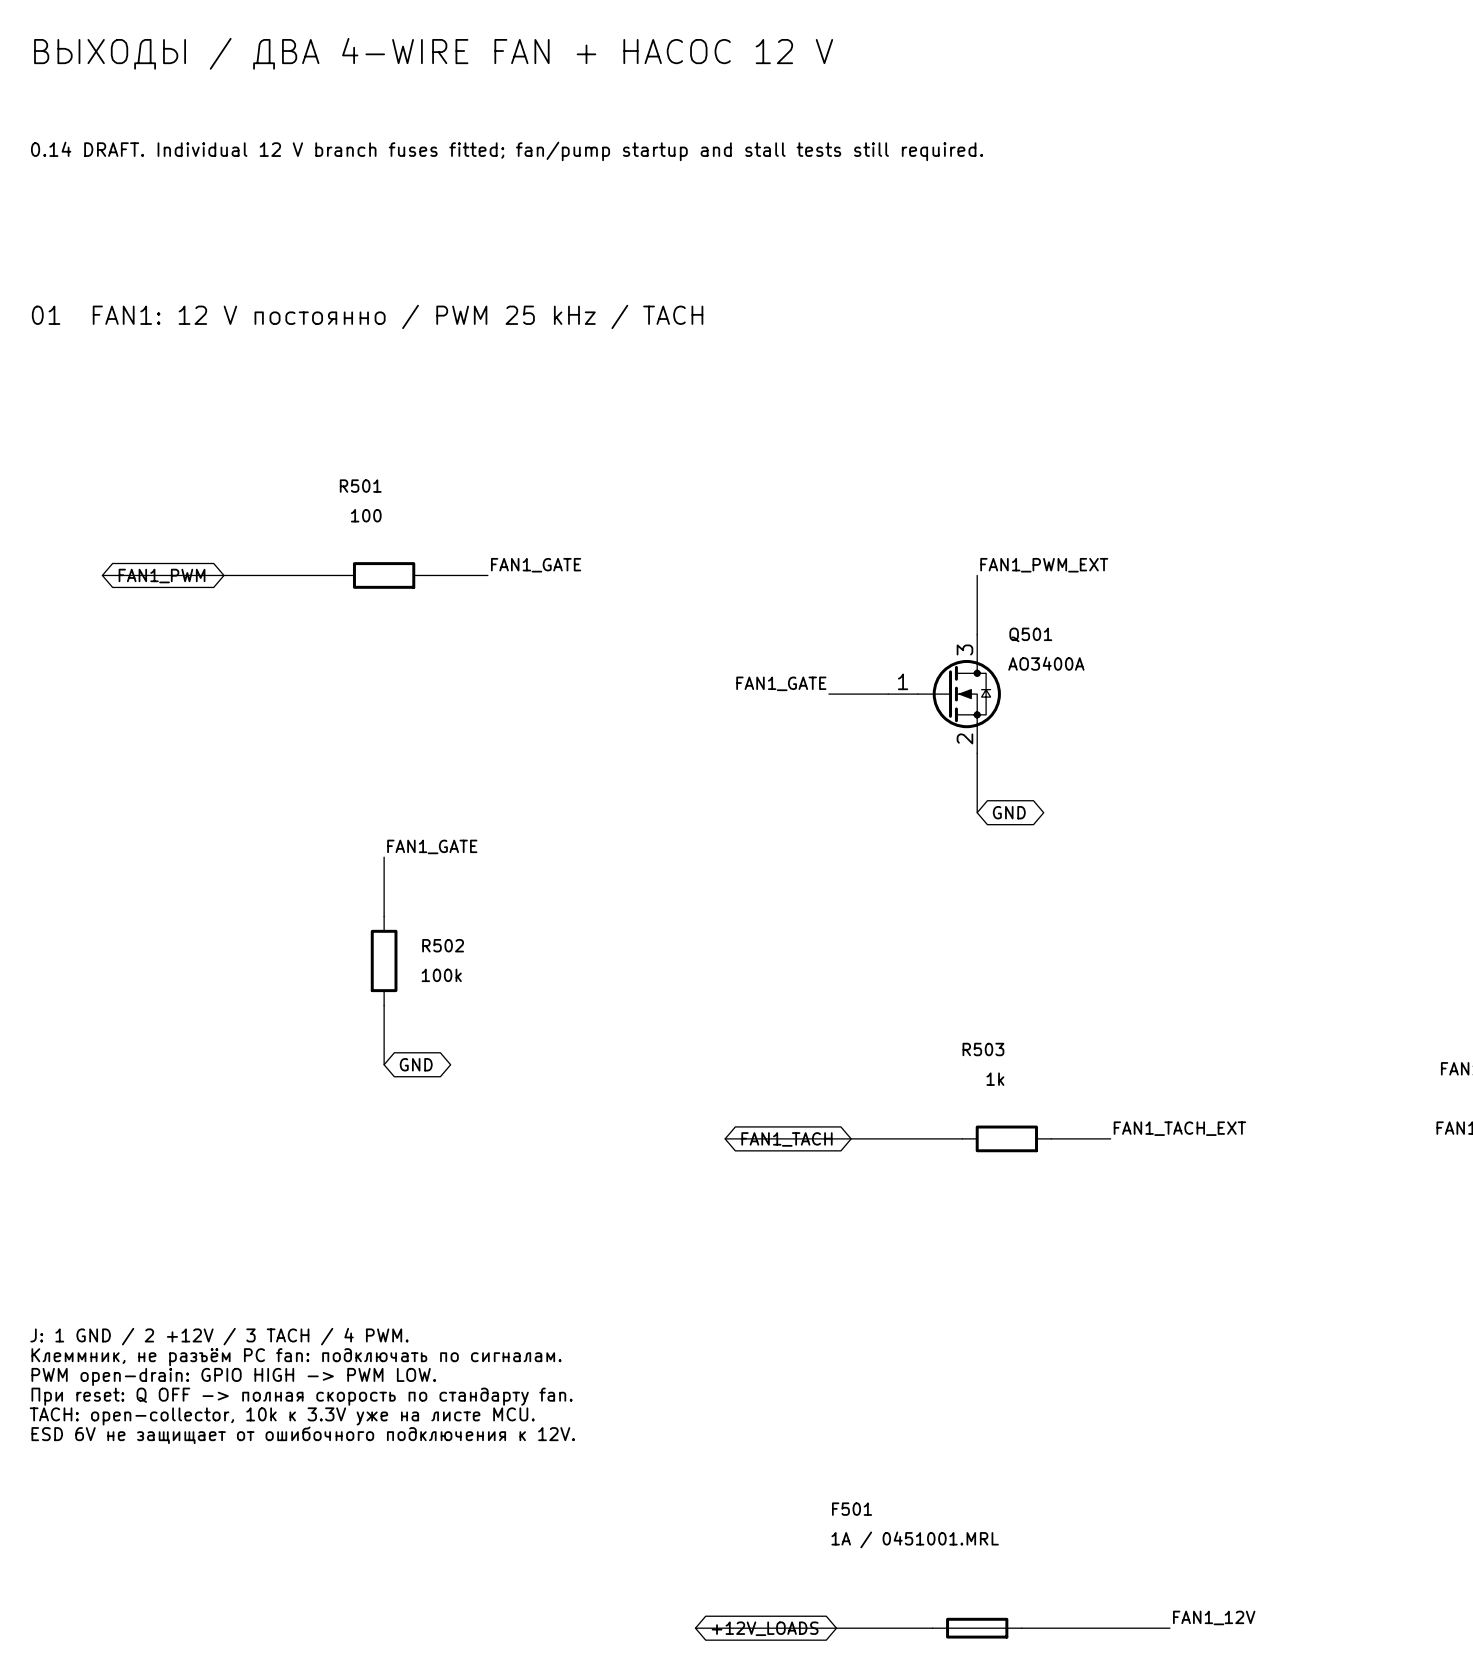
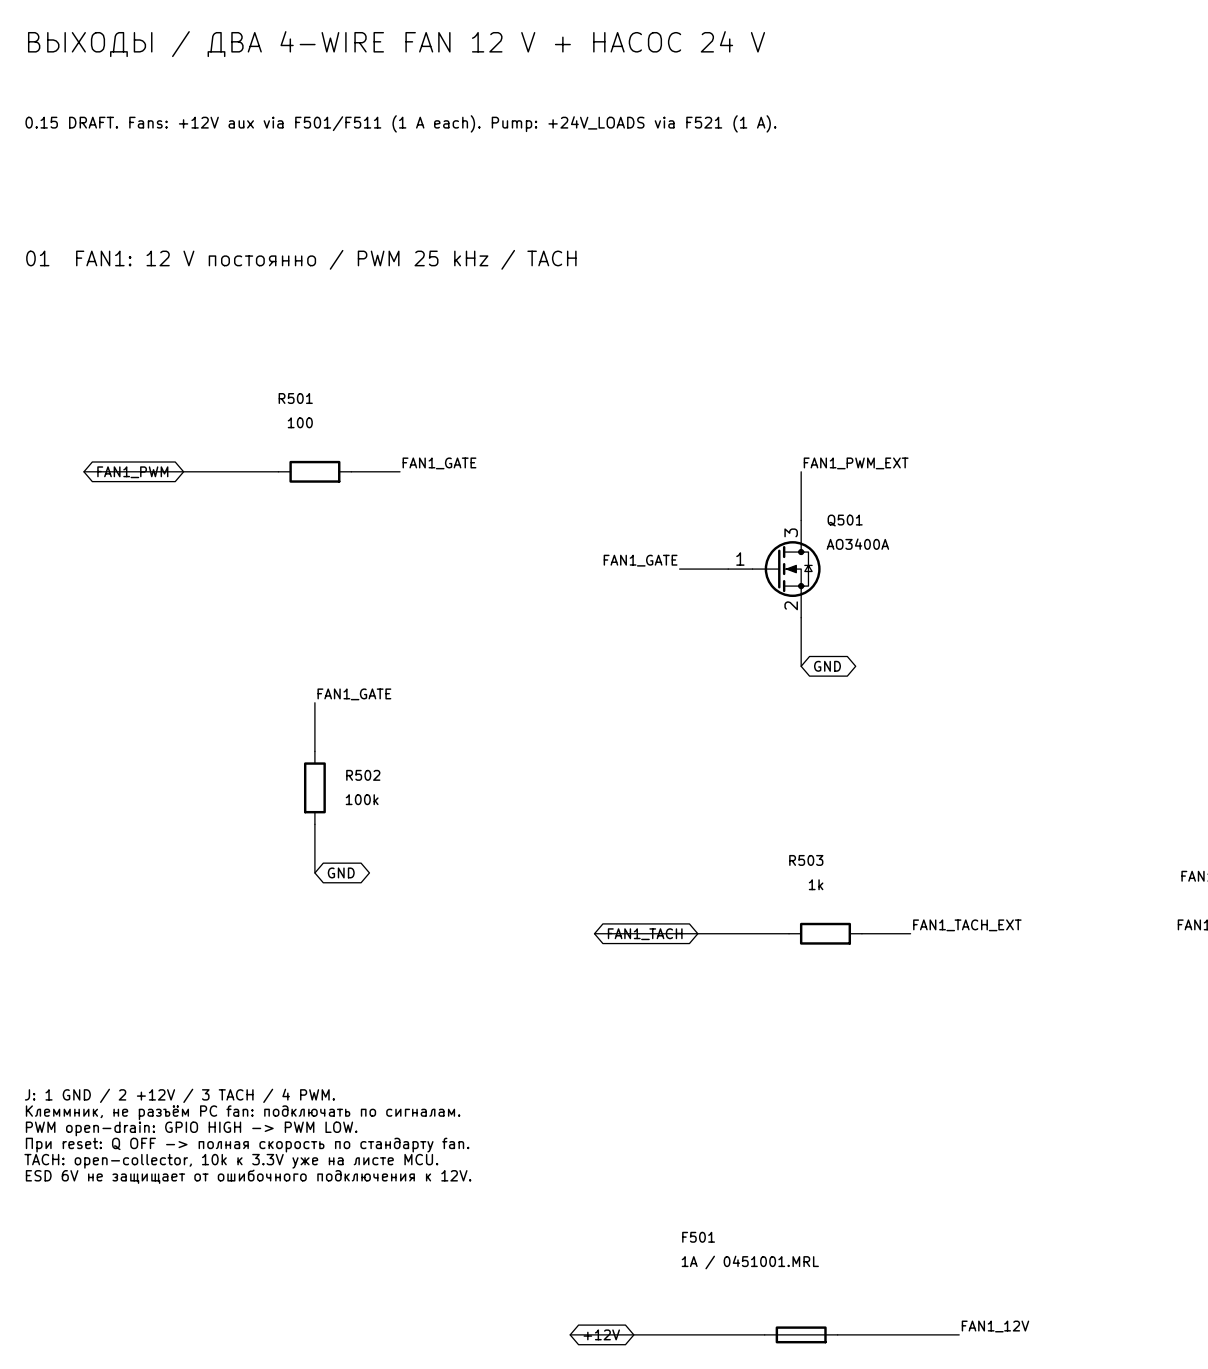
text: ВЫХОДЫ / ДВА 4-WIRE FAN + НАСОС 12 V (433, 53) -> ВЫХОДЫ / ДВА 4-WIRE FAN 12 V + НАСОС 24 V (396, 44)
text: 0.14 DRAFT. Individual 12 V branch fuses fitted; fan/pump startup and stall tests still required. (507, 151) -> 0.15 DRAFT. Fans: +12V aux via F501/F511 (1 A each). Pump: +24V_LOADS via F521 (1 A). (400, 123)
global label: +12V_LOADS (765, 1628) -> +12V (601, 1334)

